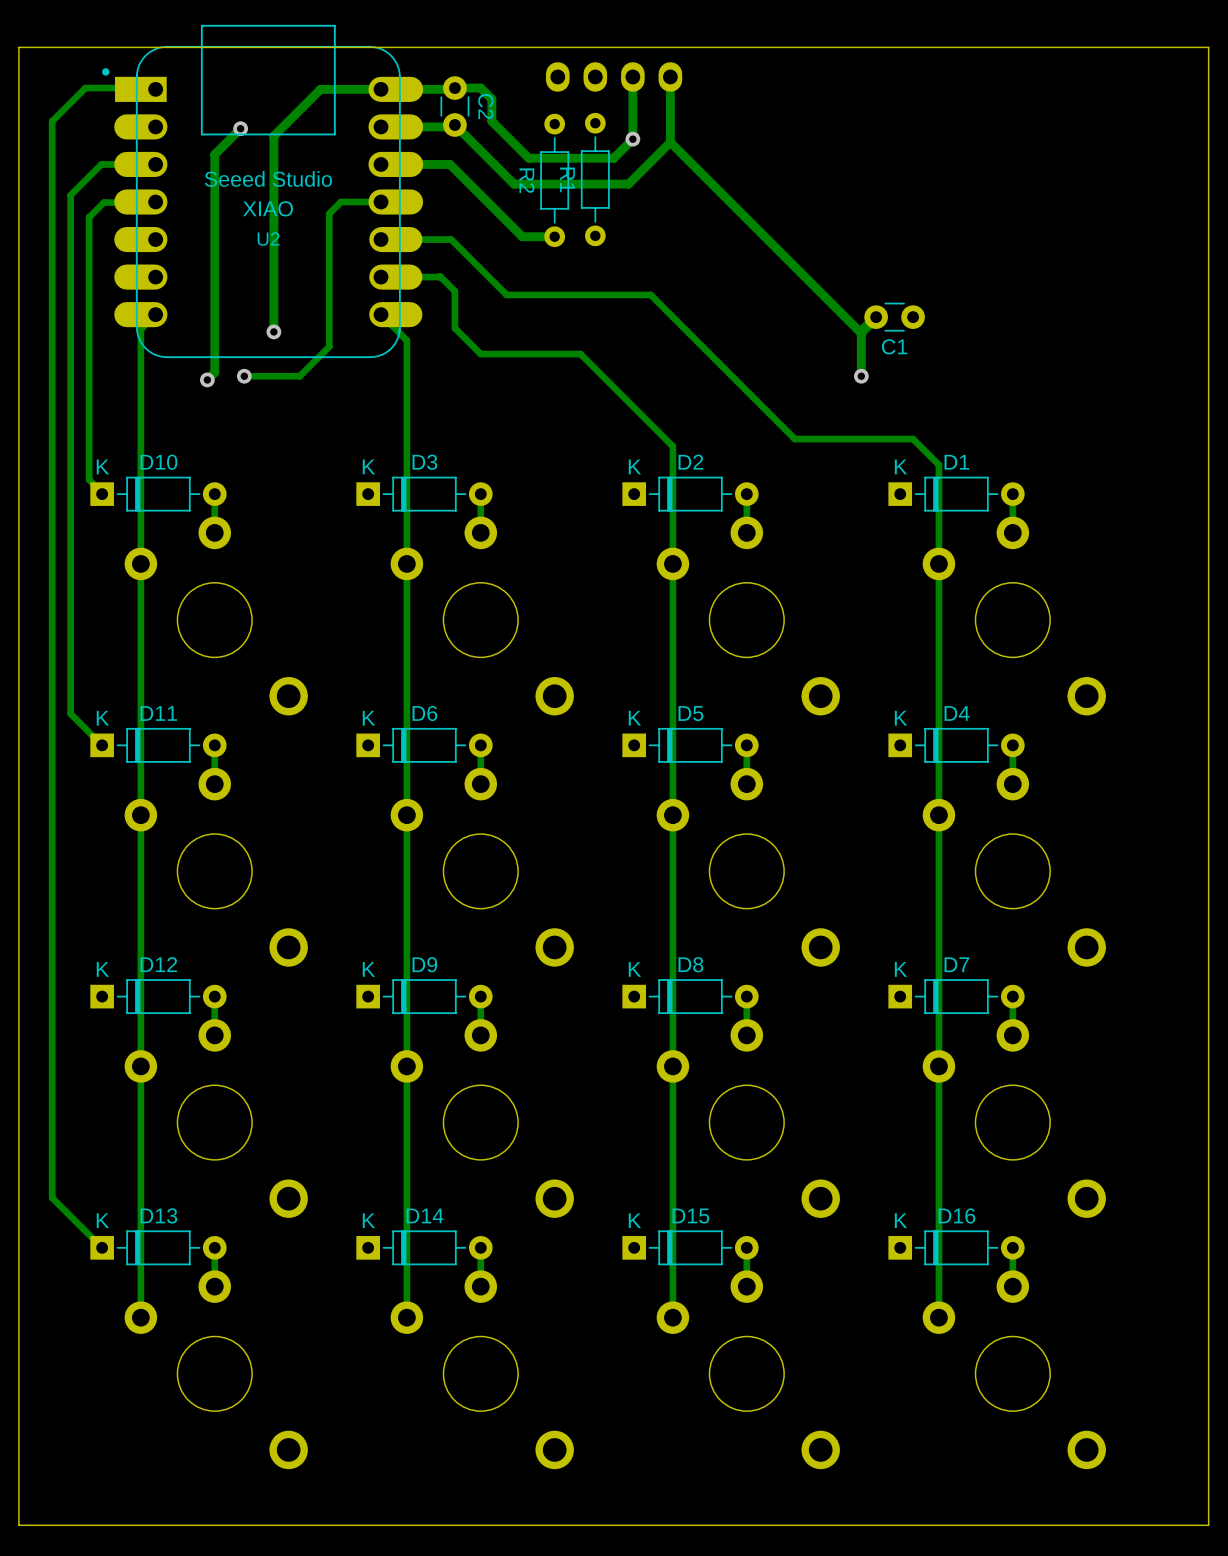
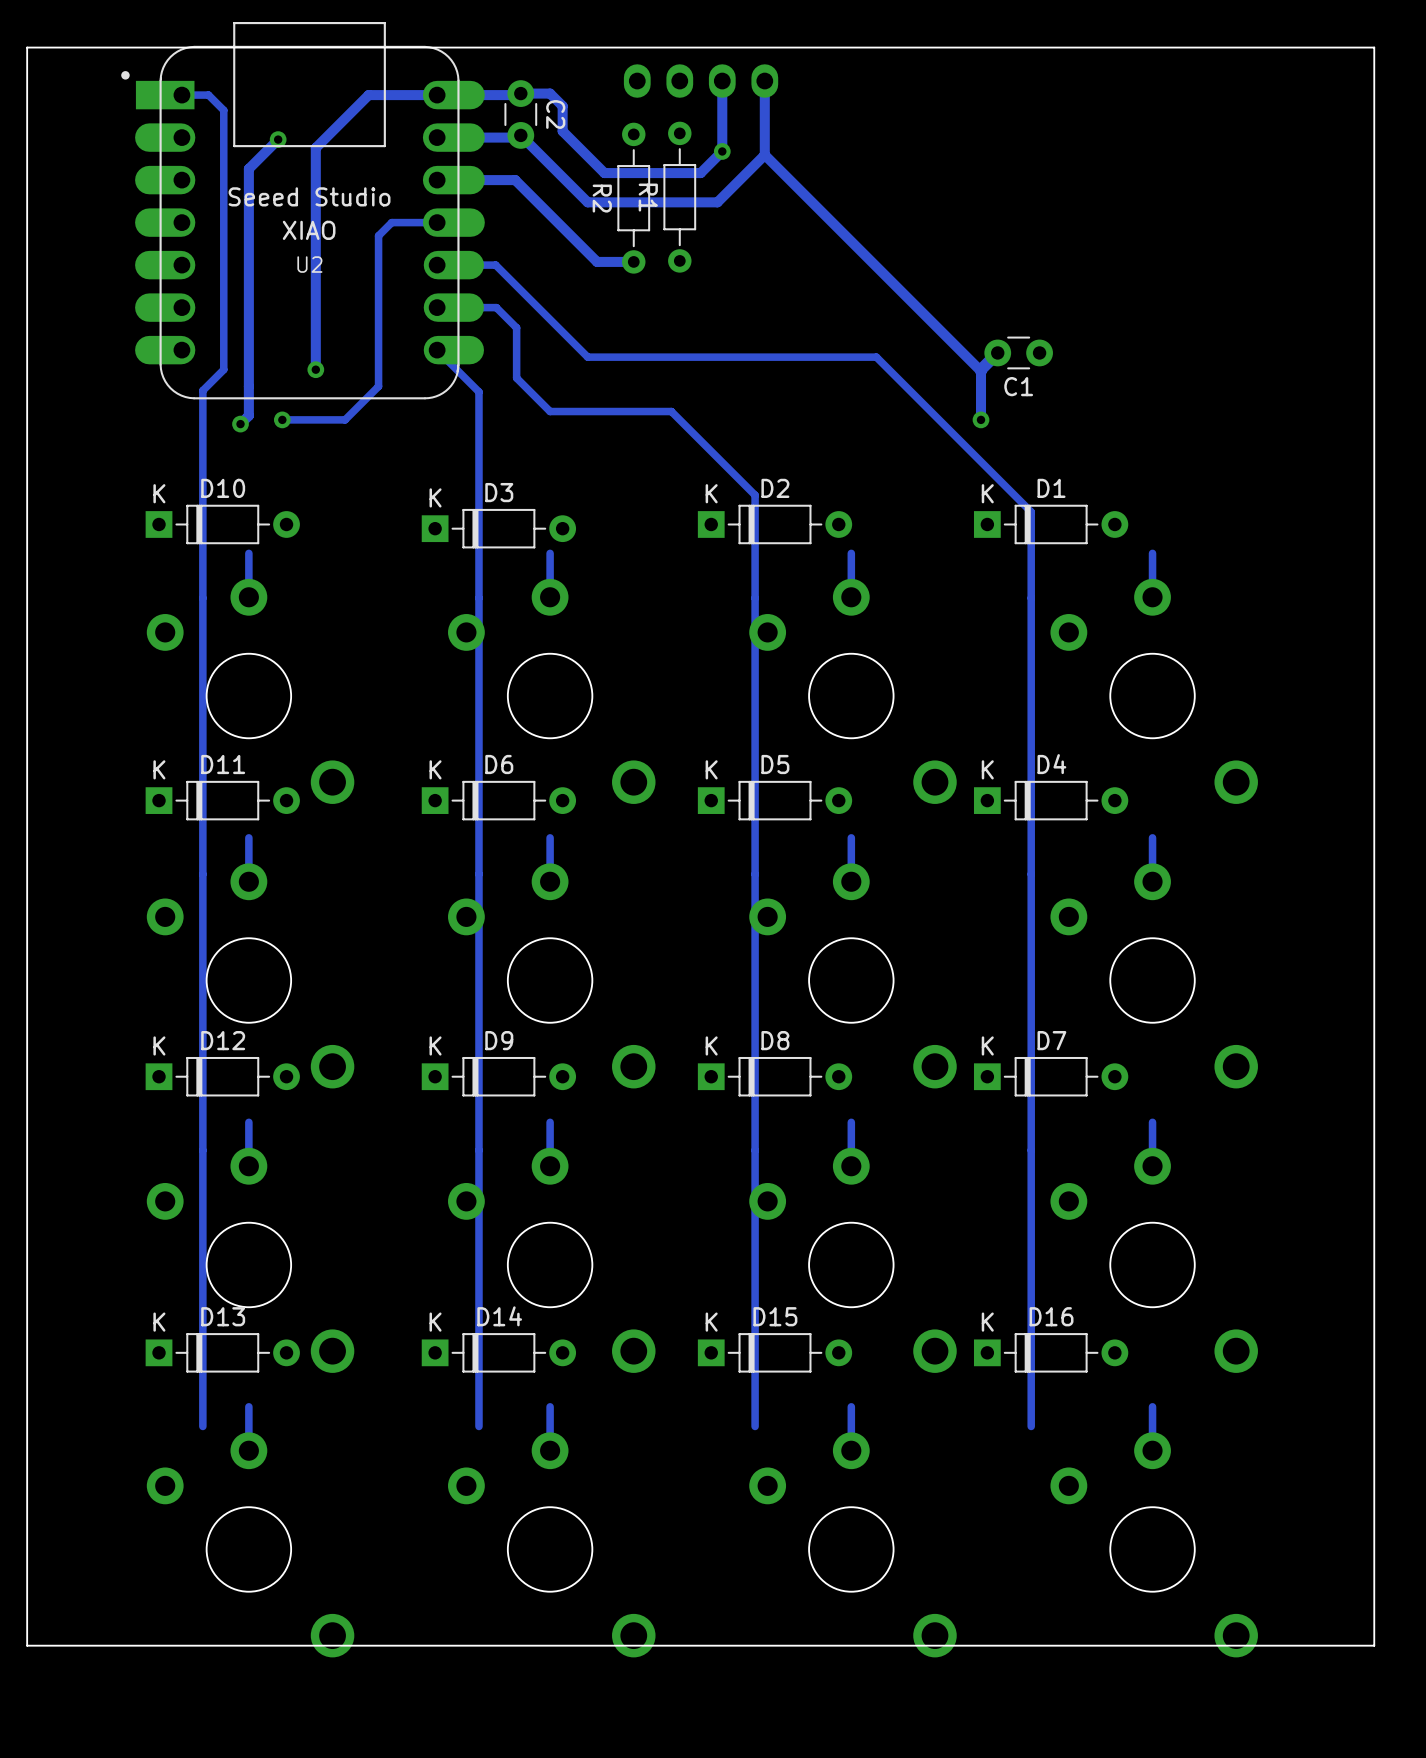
track: (155, 89) (85, 88) (52, 121) (52, 1197) (102, 1247) -> (181, 95) (208, 95) (223, 110) (223, 369) (202, 390) (202, 1426)
track: (155, 164) (101, 164) (70, 195) (70, 713) (102, 745) -> none
track: (155, 202) (103, 202) (89, 217) (89, 479) (102, 494) -> none
track: (432, 239) (451, 239) (506, 294) (650, 294) (794, 439) (913, 439) (938, 464) (938, 1317) -> (495, 265) (587, 357) (876, 357) (1031, 511) (1031, 1426)
track: (433, 277) (440, 276) (454, 291) (454, 328) (480, 354) (580, 354) (672, 446) (672, 1317) -> (496, 307) (516, 327) (516, 378) (550, 411) (671, 411) (755, 495) (755, 1426)
track: (155, 314) (140, 329) (140, 1317) -> none
track: (406, 340) (406, 1317) -> (466, 379) (478, 391) (478, 1426)
D10 position: (158, 494) -> (222, 524)
D3 position: (424, 494) -> (498, 528)
D2 position: (690, 494) -> (775, 524)
D1 position: (956, 494) -> (1051, 524)
D11 position: (158, 745) -> (222, 800)
D6 position: (424, 745) -> (498, 800)
D5 position: (690, 745) -> (775, 800)
D4 position: (956, 745) -> (1051, 800)
D12 position: (158, 996) -> (222, 1076)
D9 position: (424, 996) -> (498, 1076)
D8 position: (690, 996) -> (775, 1076)
D7 position: (956, 996) -> (1051, 1076)
D13 position: (158, 1247) -> (222, 1352)
D14 position: (424, 1247) -> (498, 1352)
D15 position: (690, 1247) -> (775, 1352)
D16 position: (956, 1247) -> (1051, 1352)
board edge: (1208, 1458) (1208, 1525) (18, 1525) (18, 1458) -> (1374, 1645) (27, 1645)

